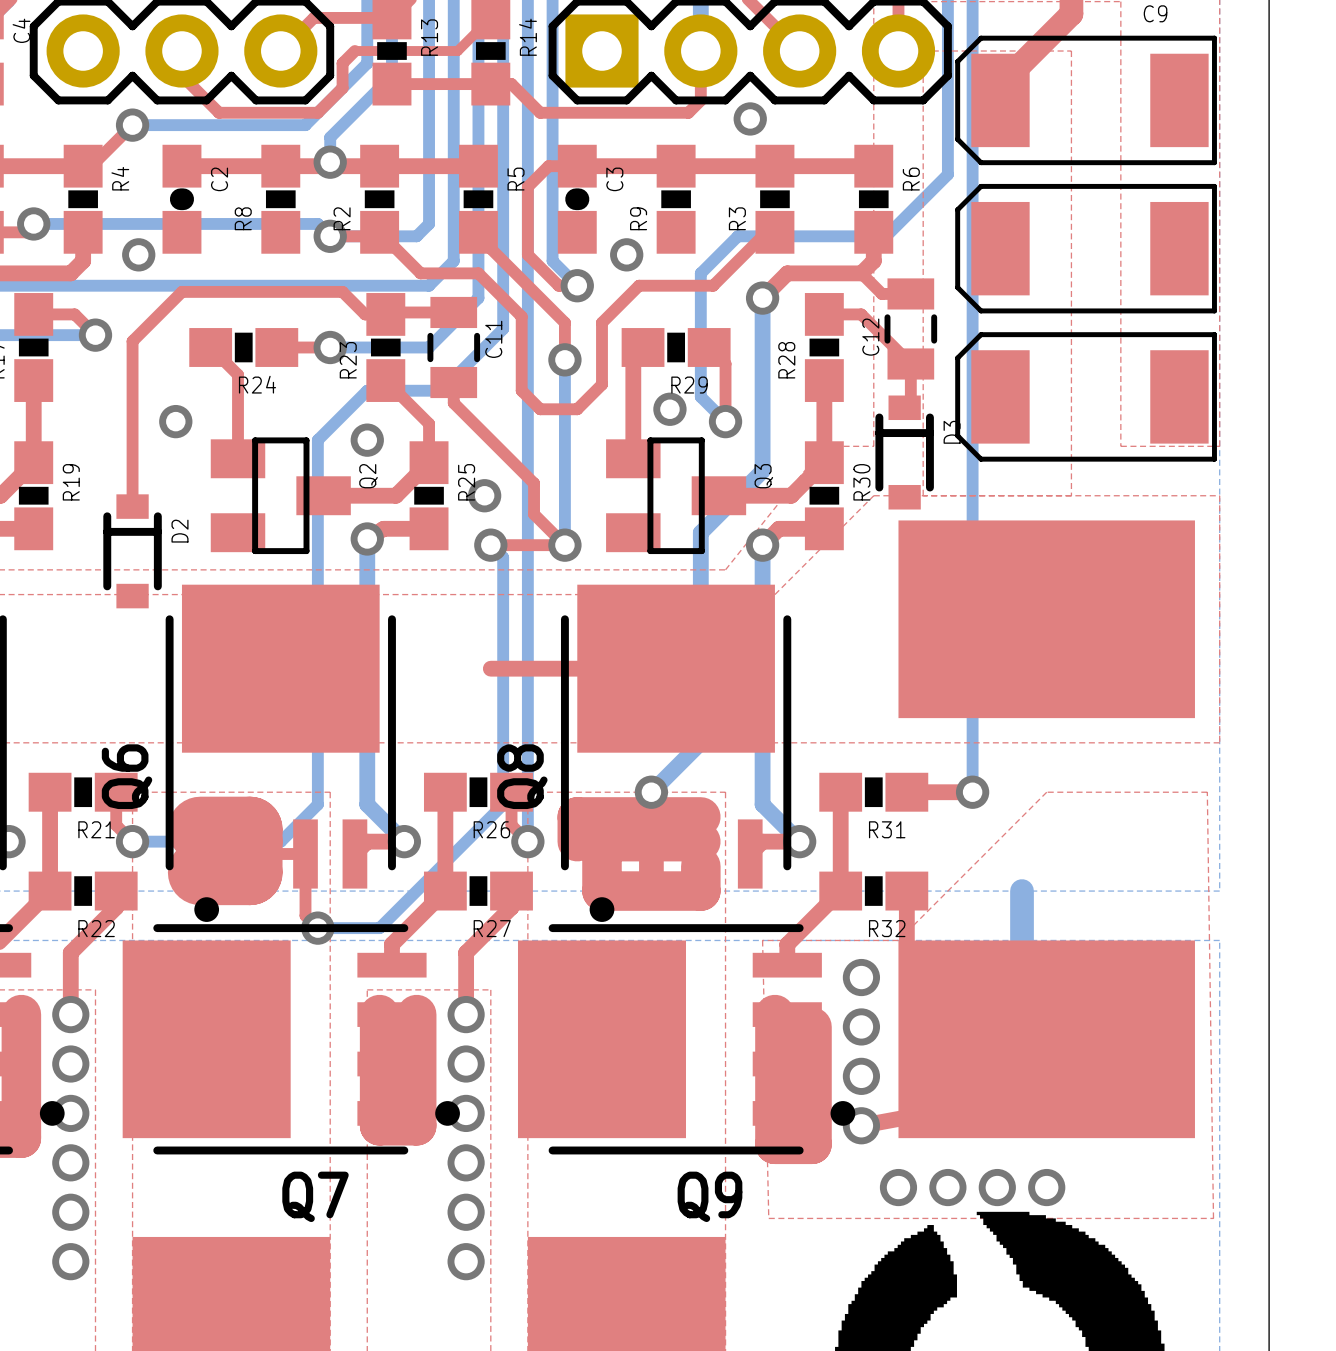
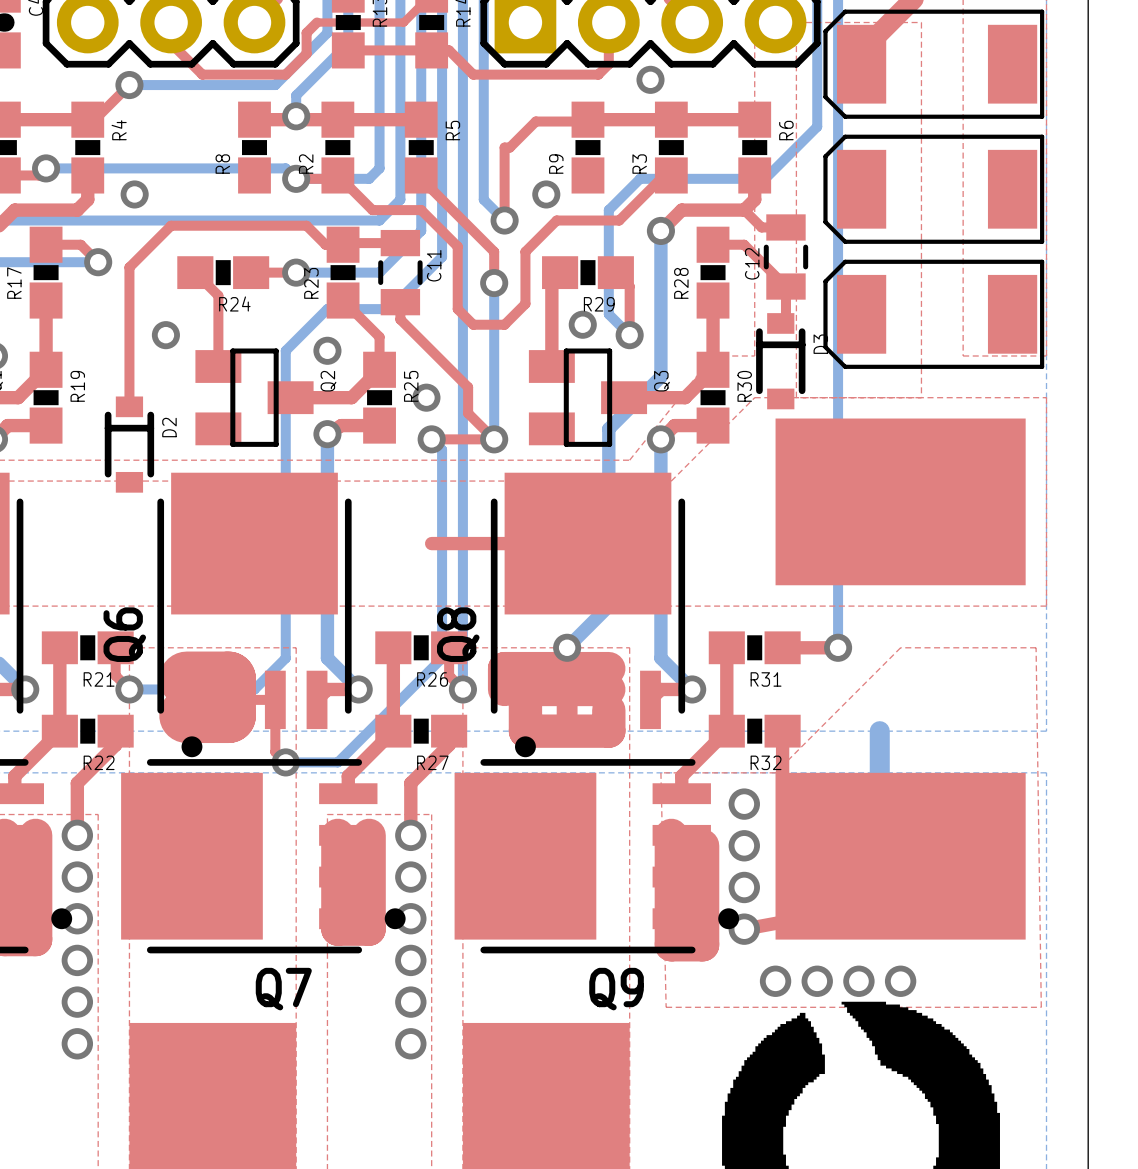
top track: (181, 166) (280, 166) -> none
top track: (676, 166) (548, 166) (527, 186) (527, 254) (558, 285) (577, 285) -> (587, 119) (586, 121) (535, 121) (509, 147) (504, 147) (504, 220)
C2: (181, 199) -> none
C3: (577, 199) -> none

